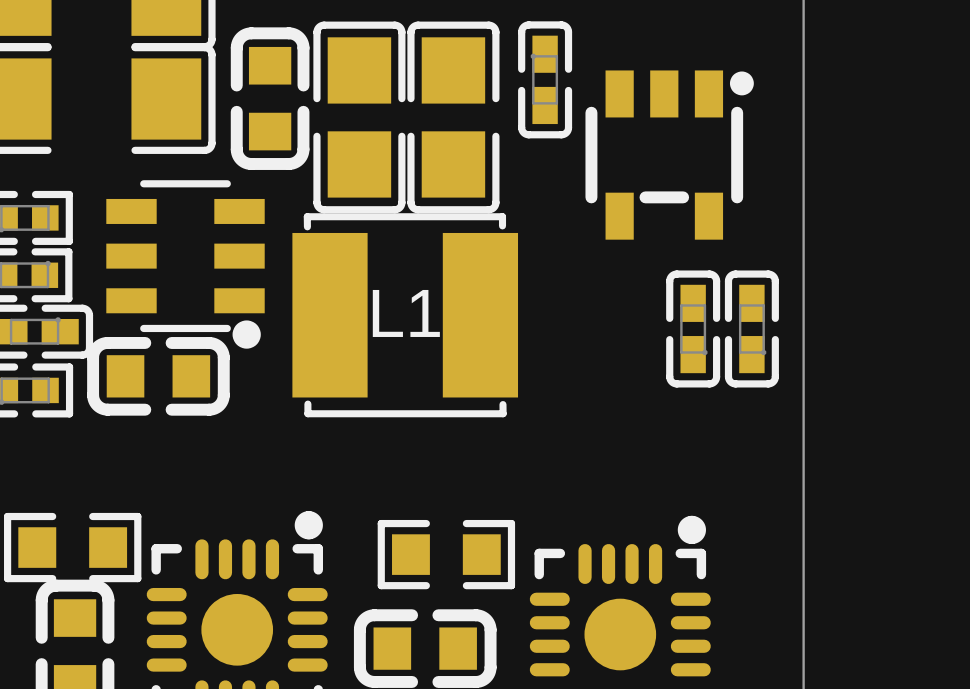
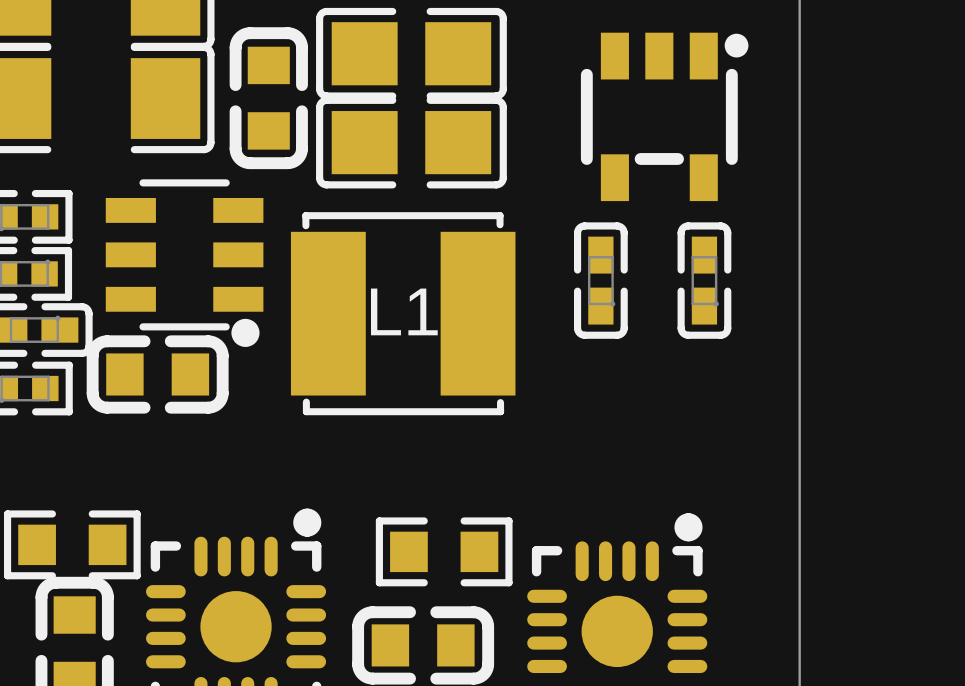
part: none -> (411, 53)
part: (545, 79) -> none
part: (359, 117) -> none
part: (453, 117) -> none
part: none -> (411, 142)
part position: (669, 155) -> (664, 116)
part: none -> (600, 280)
part: none -> (704, 280)
part: (693, 328) -> none
part: (751, 328) -> none

